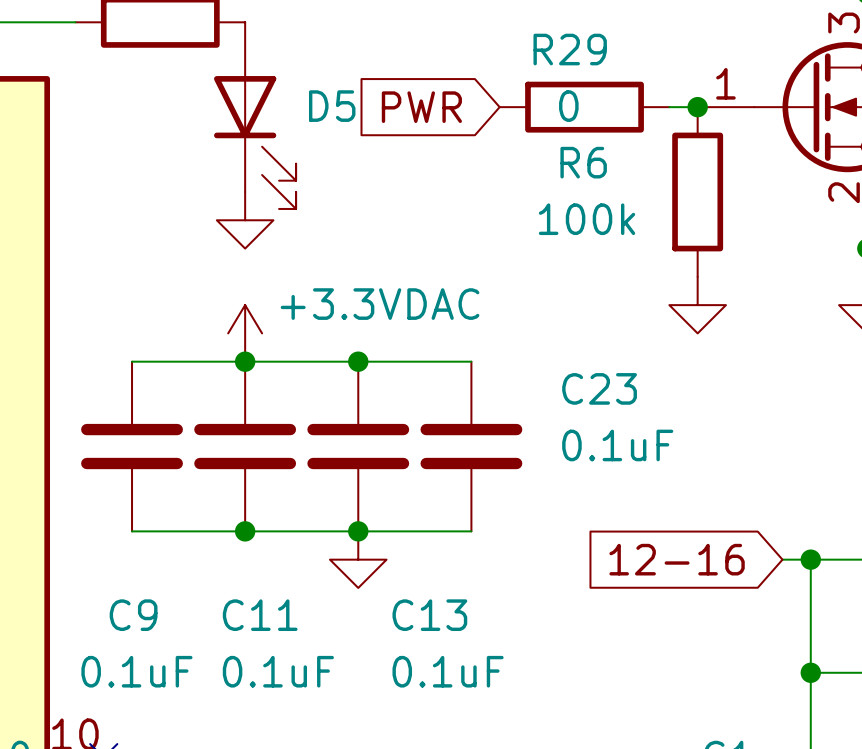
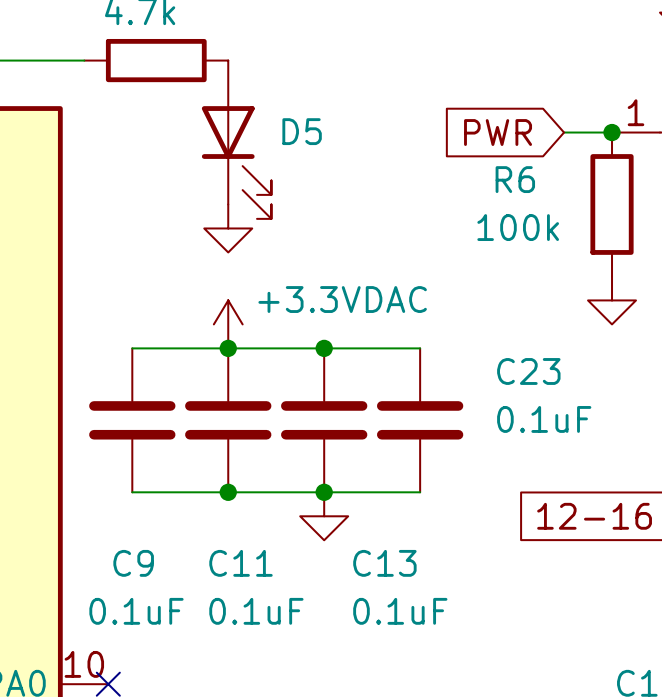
global label position: PWR (421, 107) -> PWR (498, 132)
R29: 0 (584, 107) -> none

